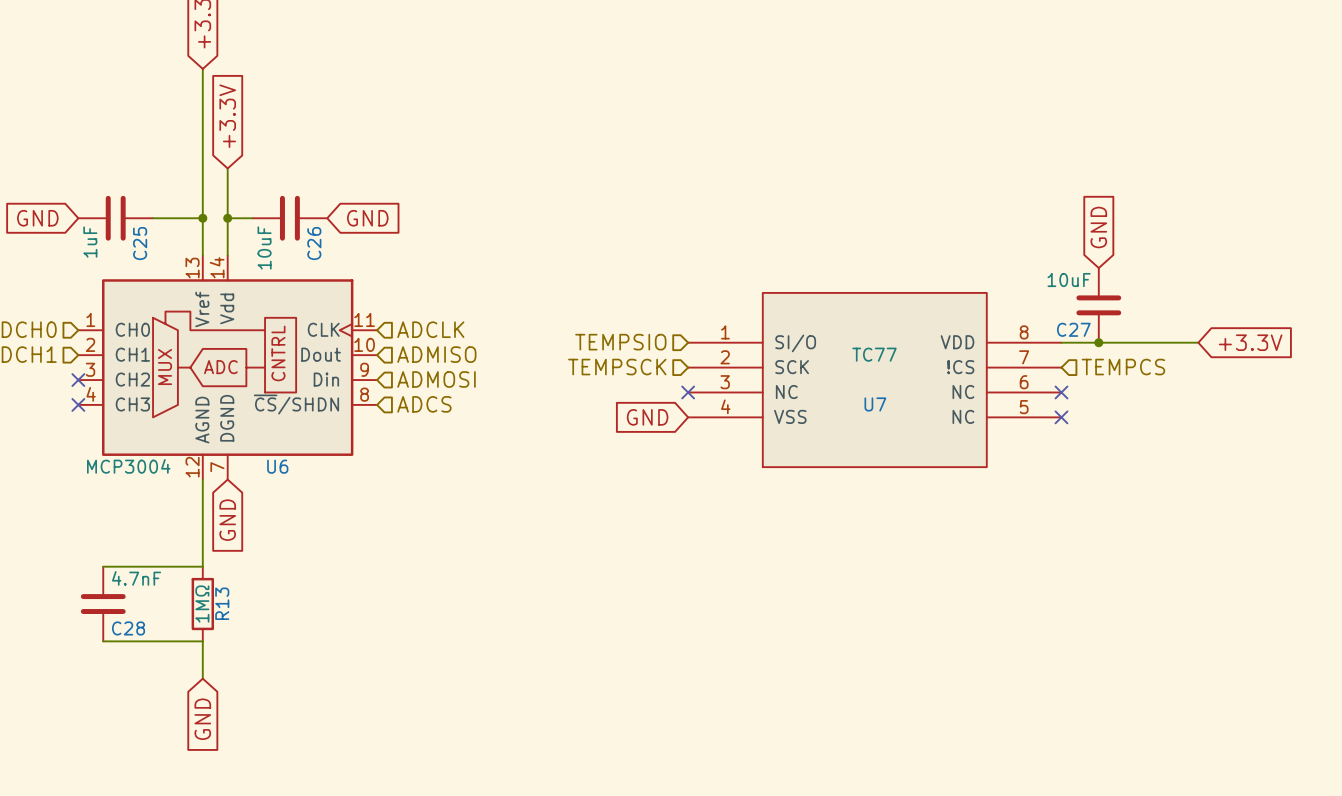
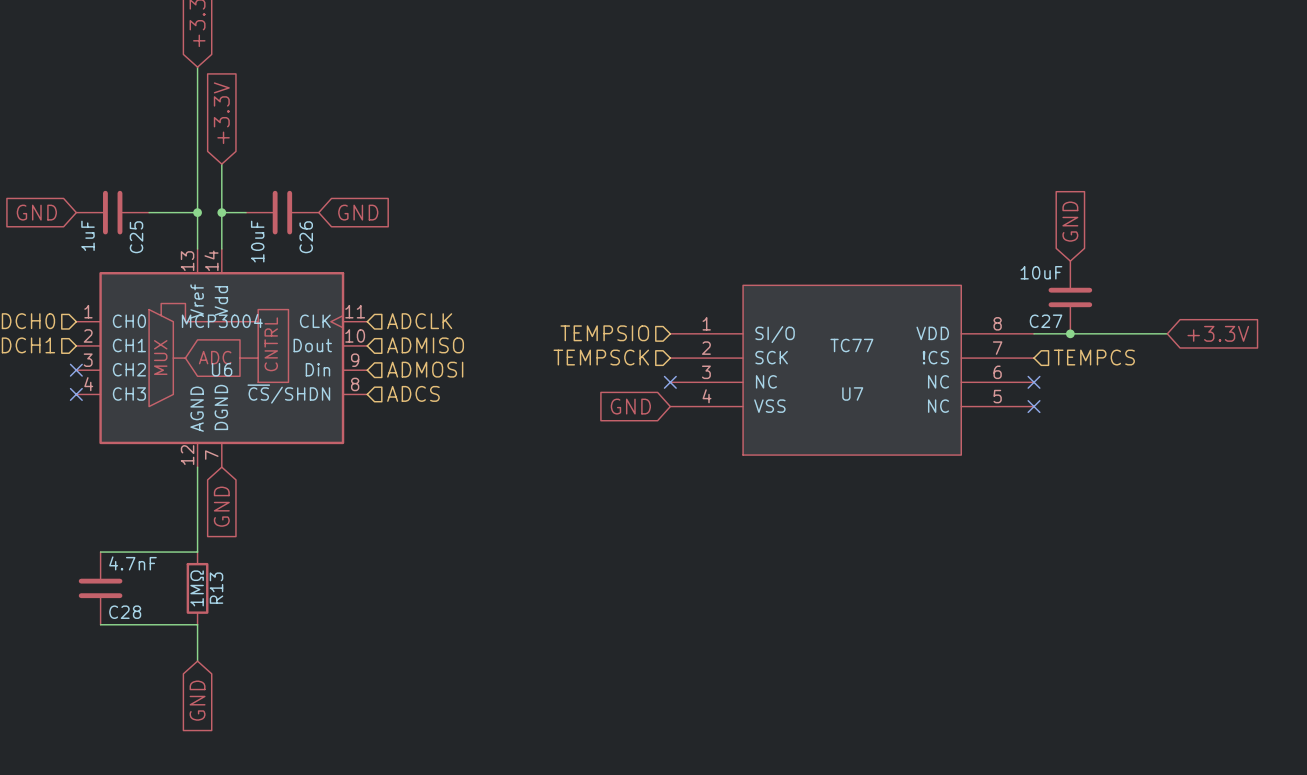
U6 value position: MCP3004 (128, 466) -> MCP3004 (222, 320)
U6 name position: U6 (277, 466) -> U6 (222, 369)

